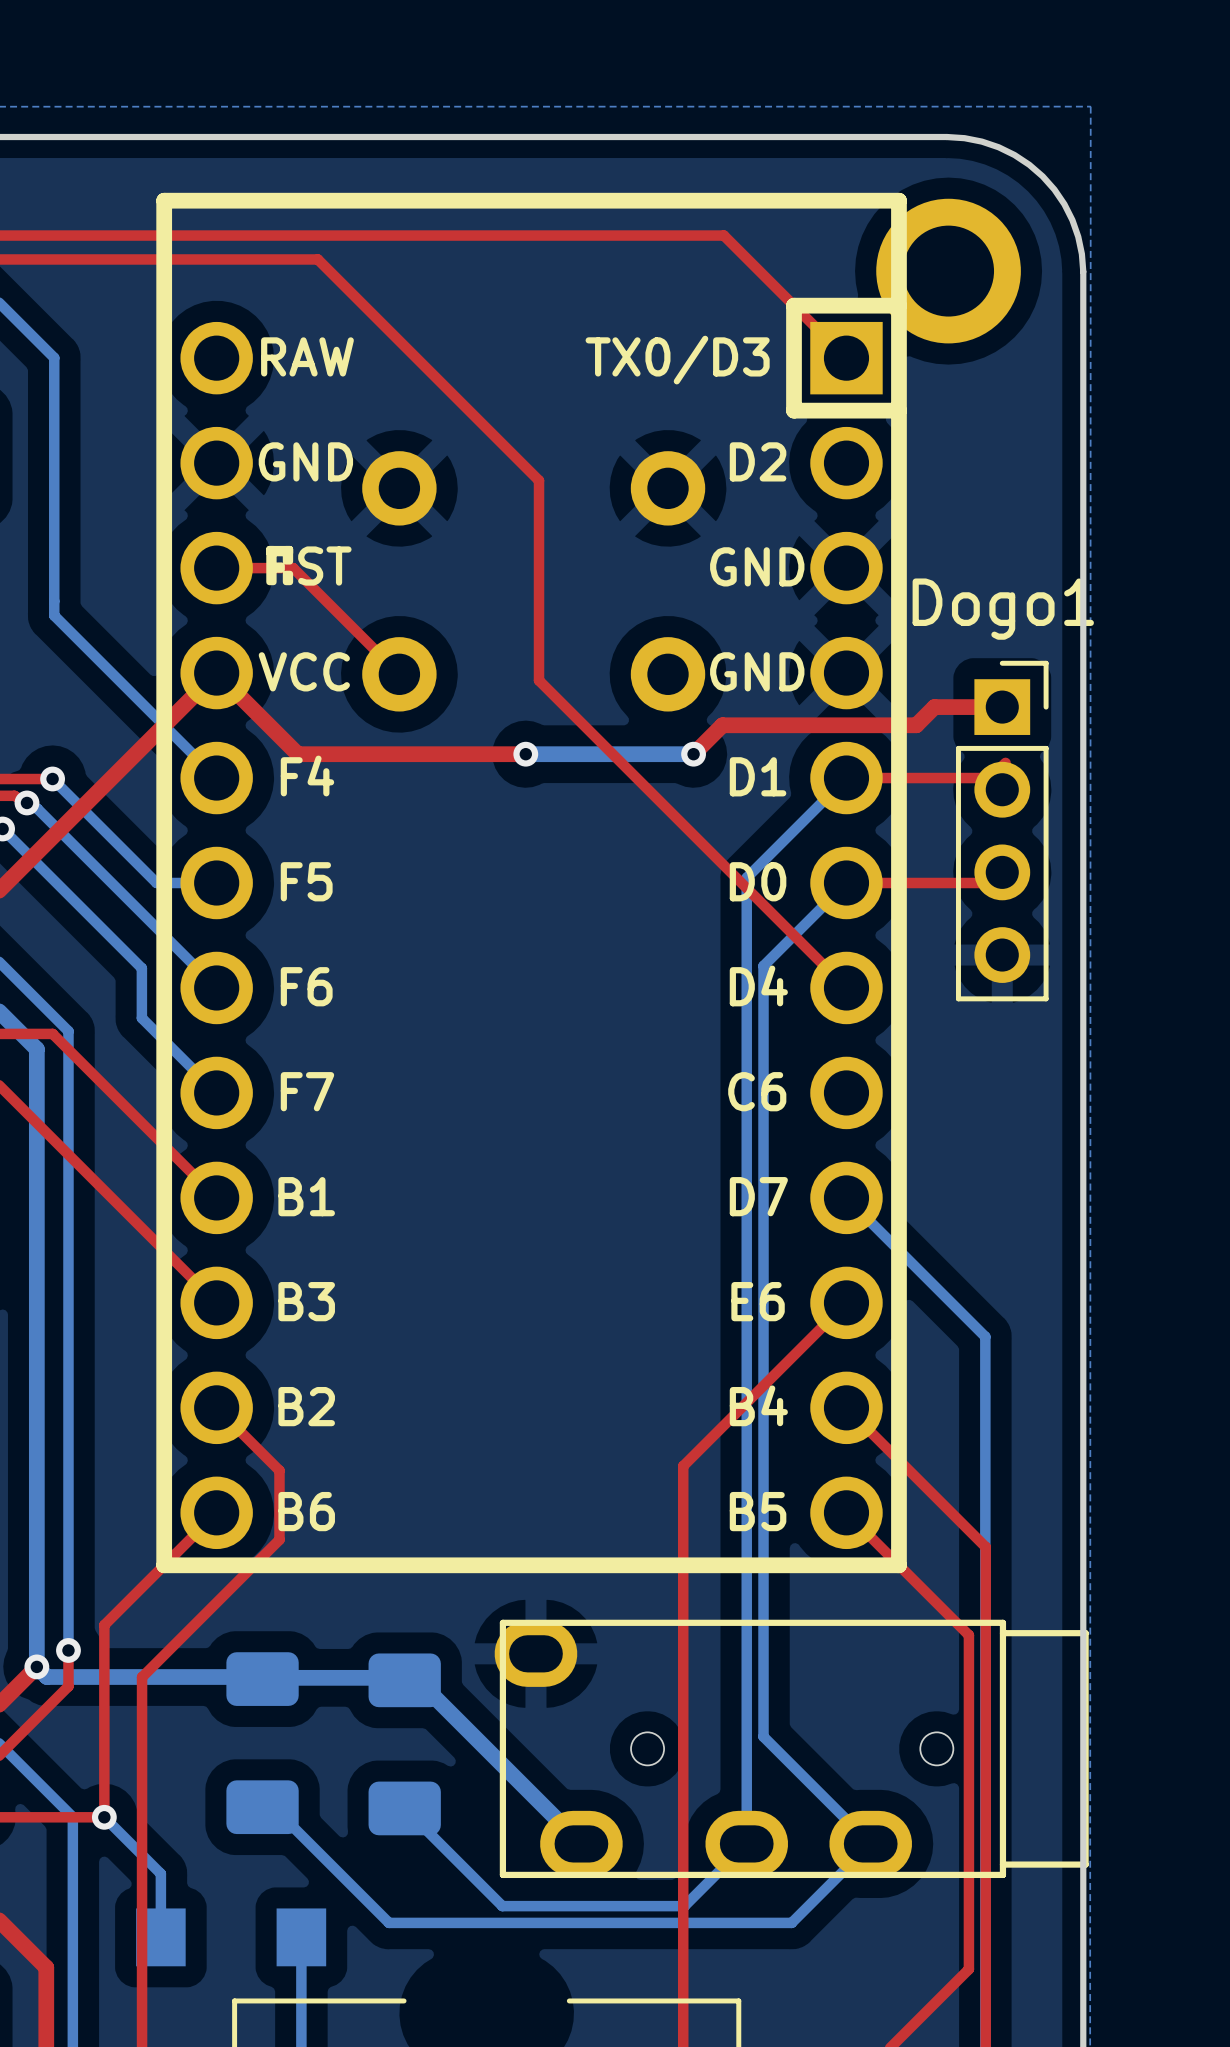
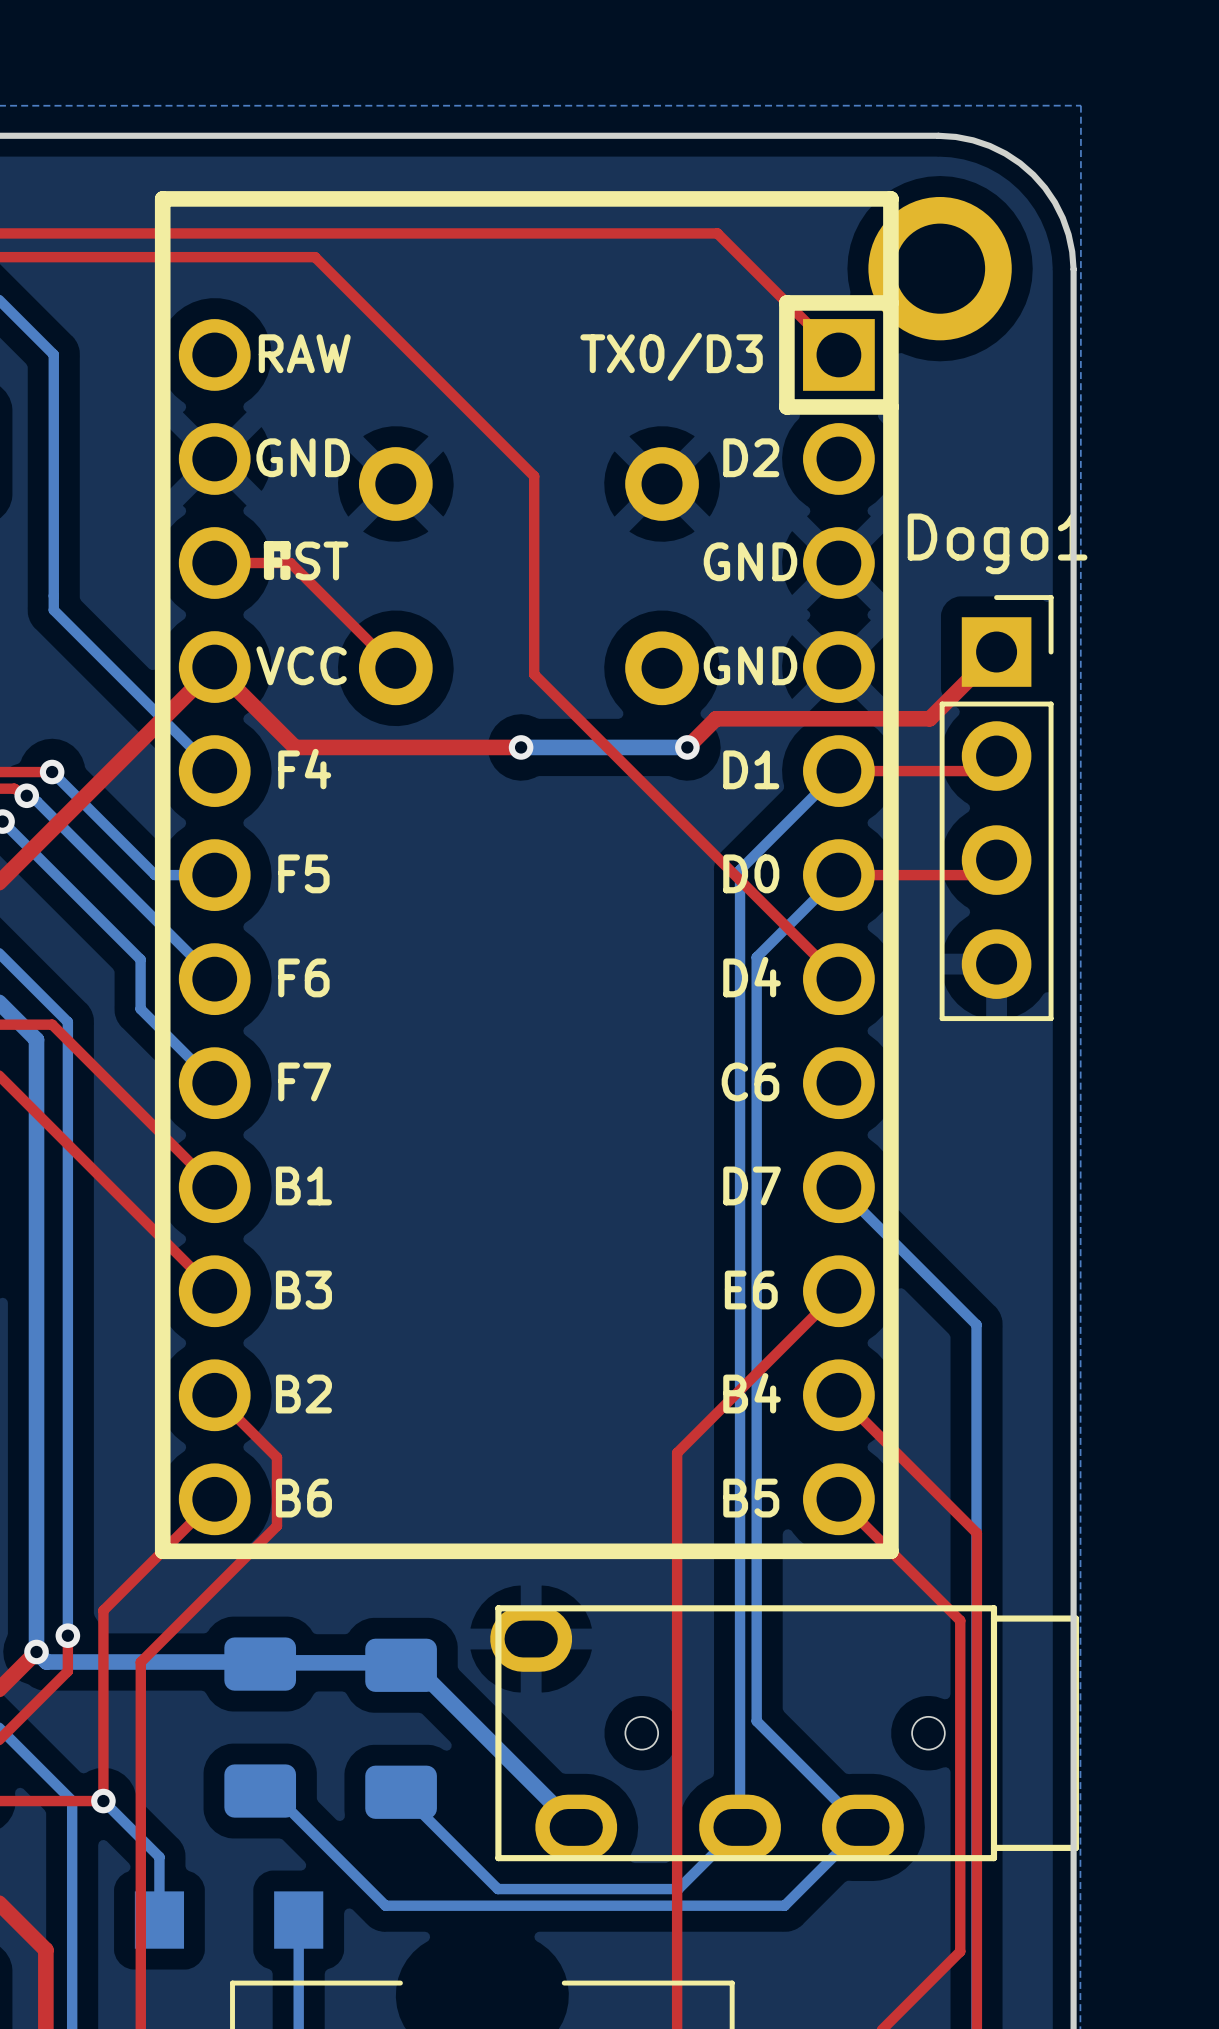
Dogo1 footprint: [956, 660, 1049, 1002] -> [939, 595, 1054, 1022]
top track: (1002, 707) (934, 707) (916, 725) -> (996, 652) (929, 718) (908, 718)

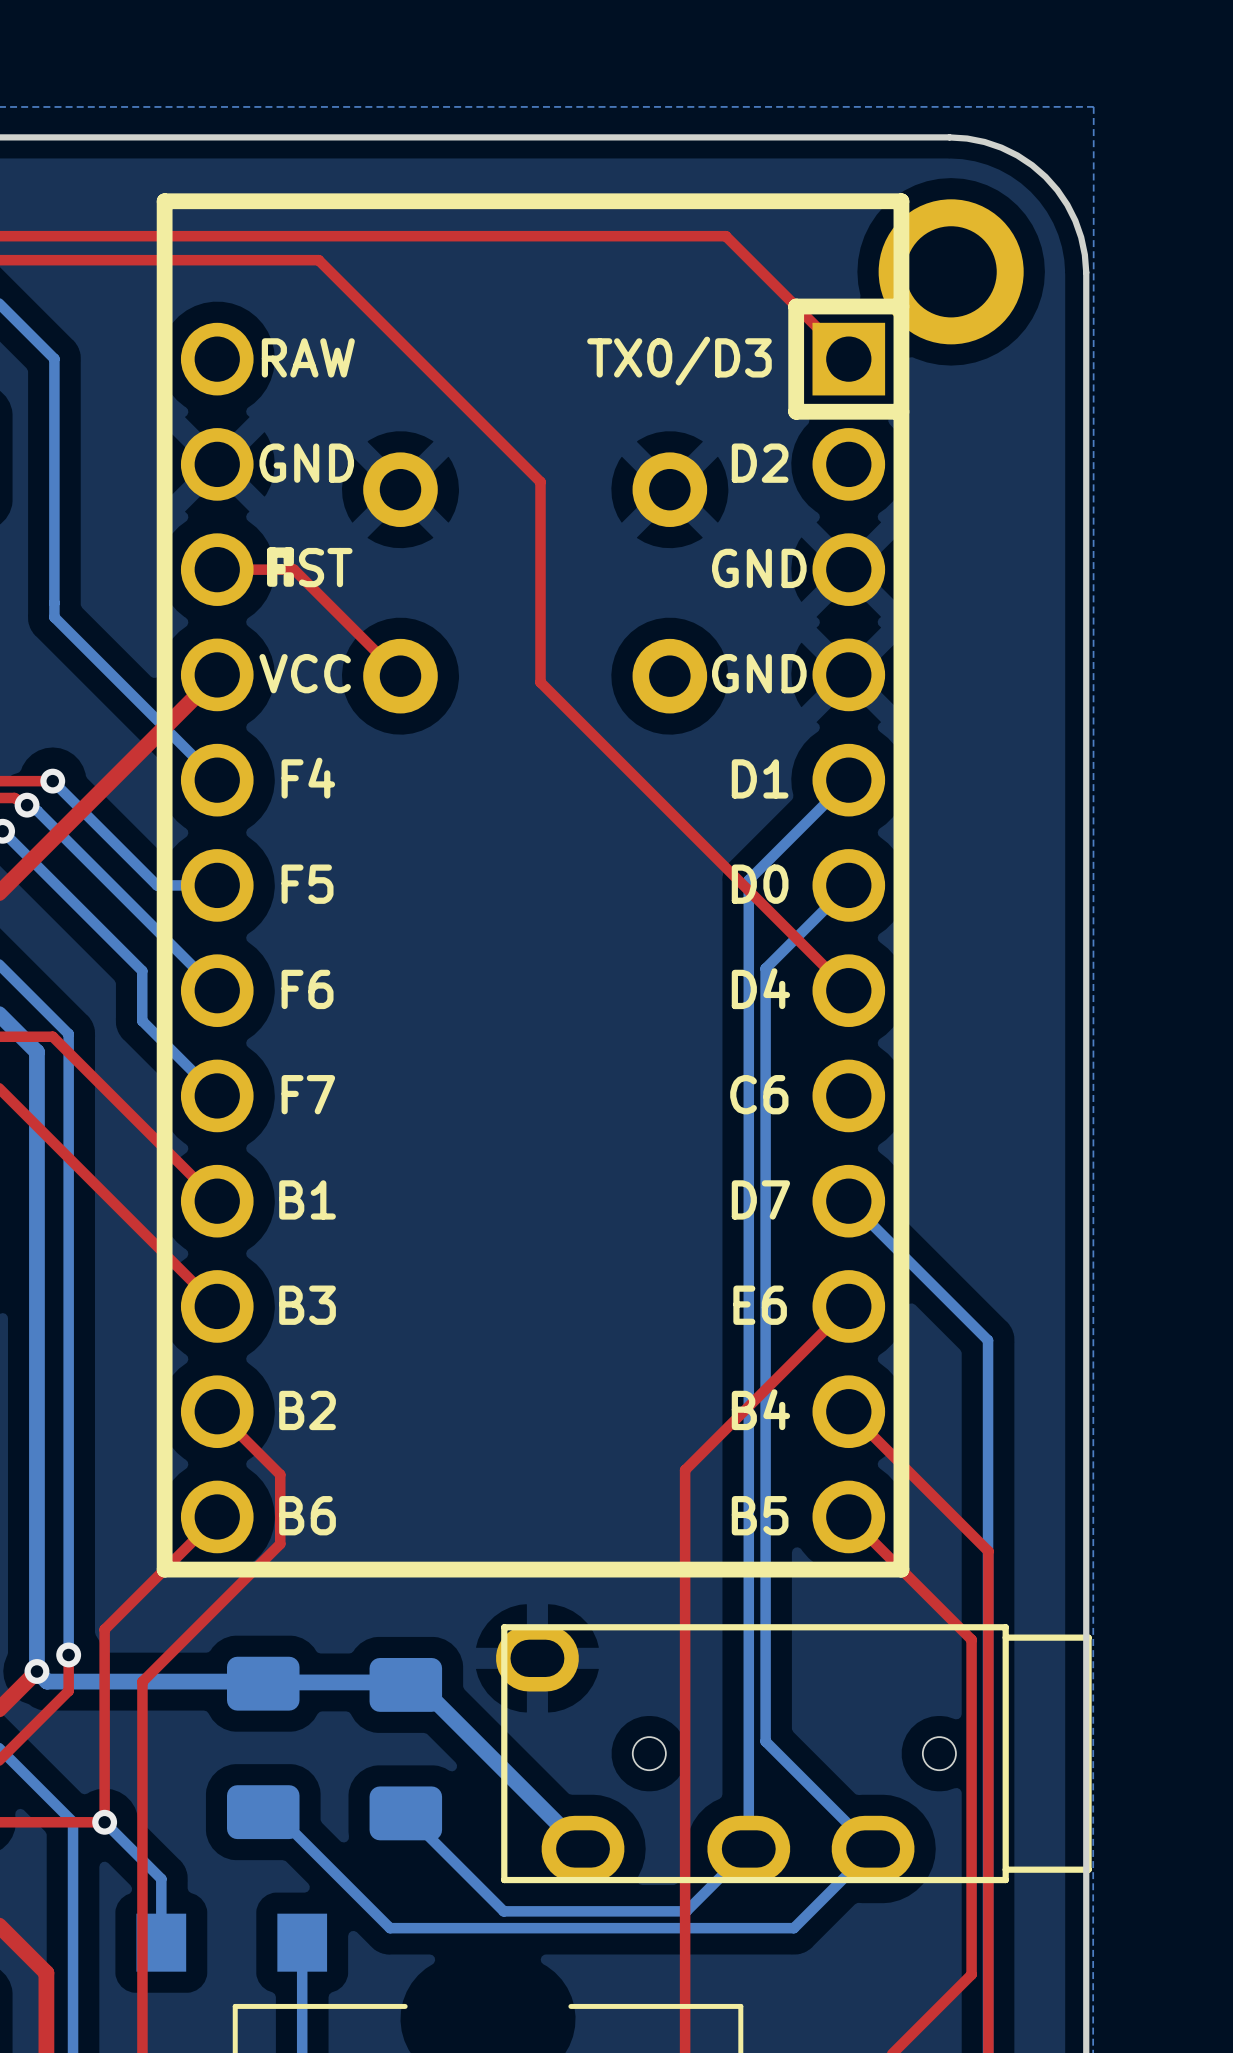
top track: (996, 652) (929, 718) (716, 718) (687, 747) -> none
top track: (214, 667) (295, 747) (521, 747) -> none
bottom track: (521, 747) (687, 747) -> none
via: (521, 747) -> none
via: (687, 747) -> none
top track: (996, 756) (981, 771) (838, 771) -> none
Dogo1: (996, 808) -> none
top track: (993, 864) (982, 875) (838, 875) -> none

